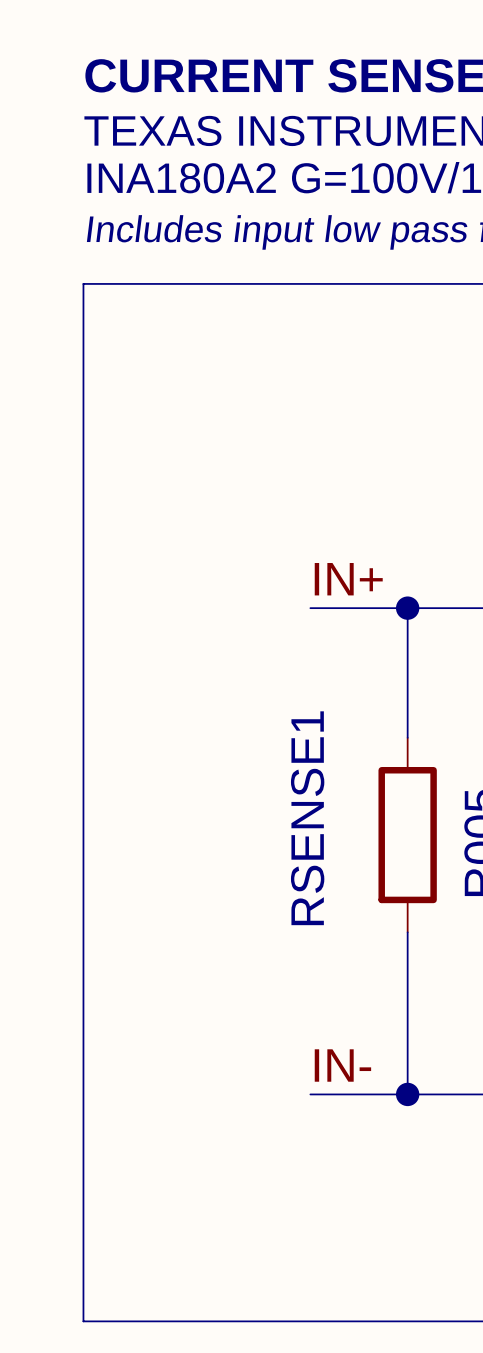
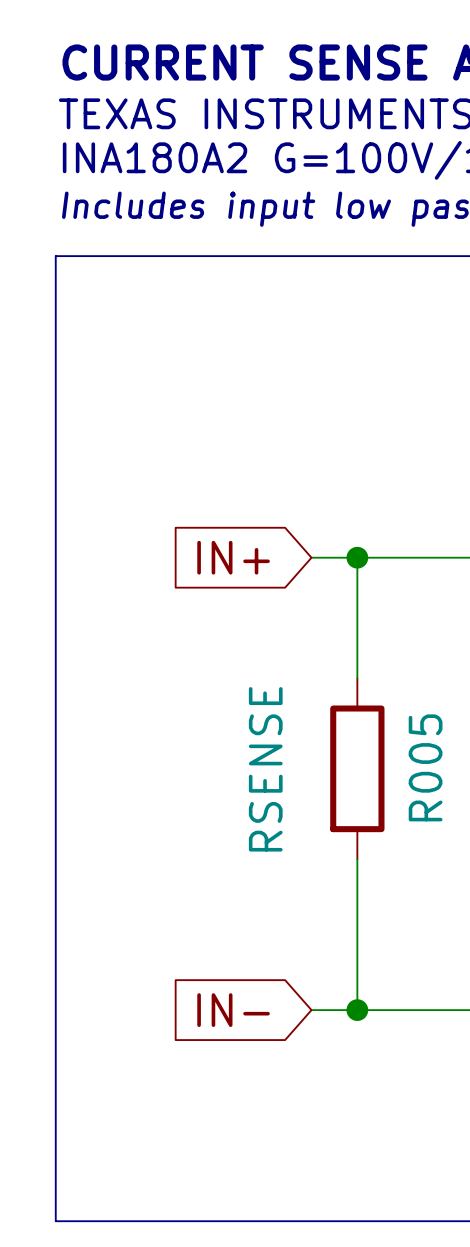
label: IN+ (348, 579) -> none
global label: none -> IN+ (233, 557)
wire: (310, 608) (358, 608) -> none
RSENSE1 name: RSENSE1 (307, 818) -> RSENSE (265, 769)
label: IN- (342, 1065) -> none
global label: none -> IN- (233, 1010)
wire: (310, 1094) (358, 1094) -> none

